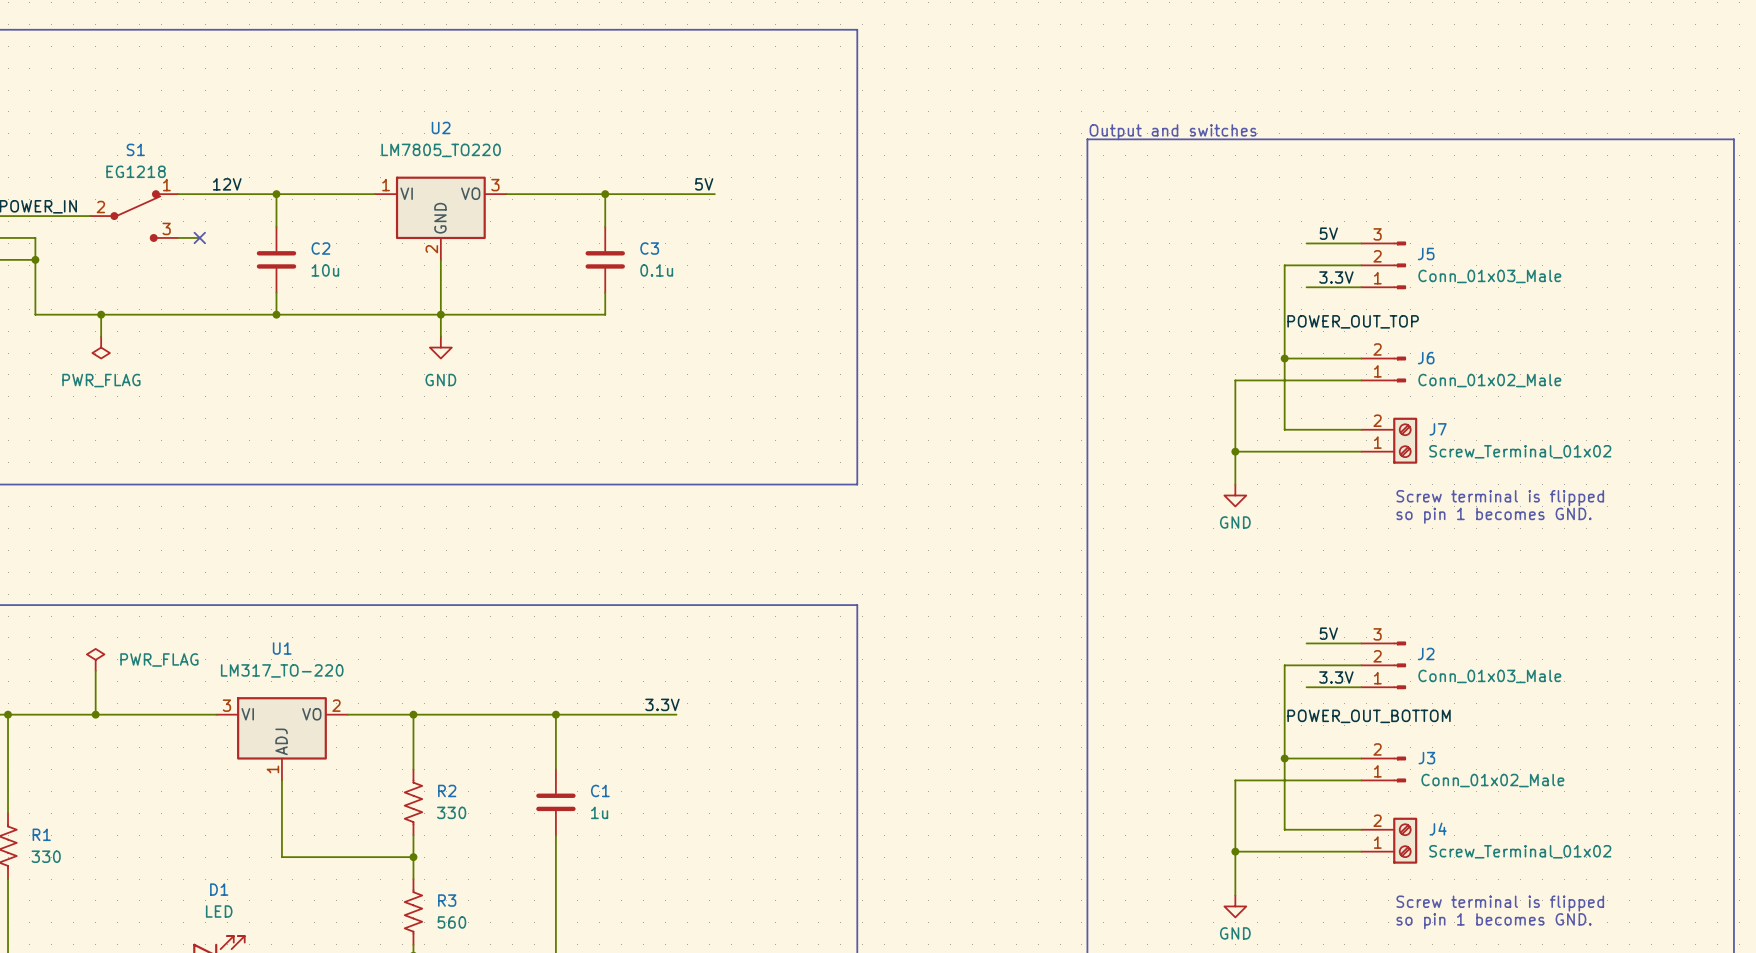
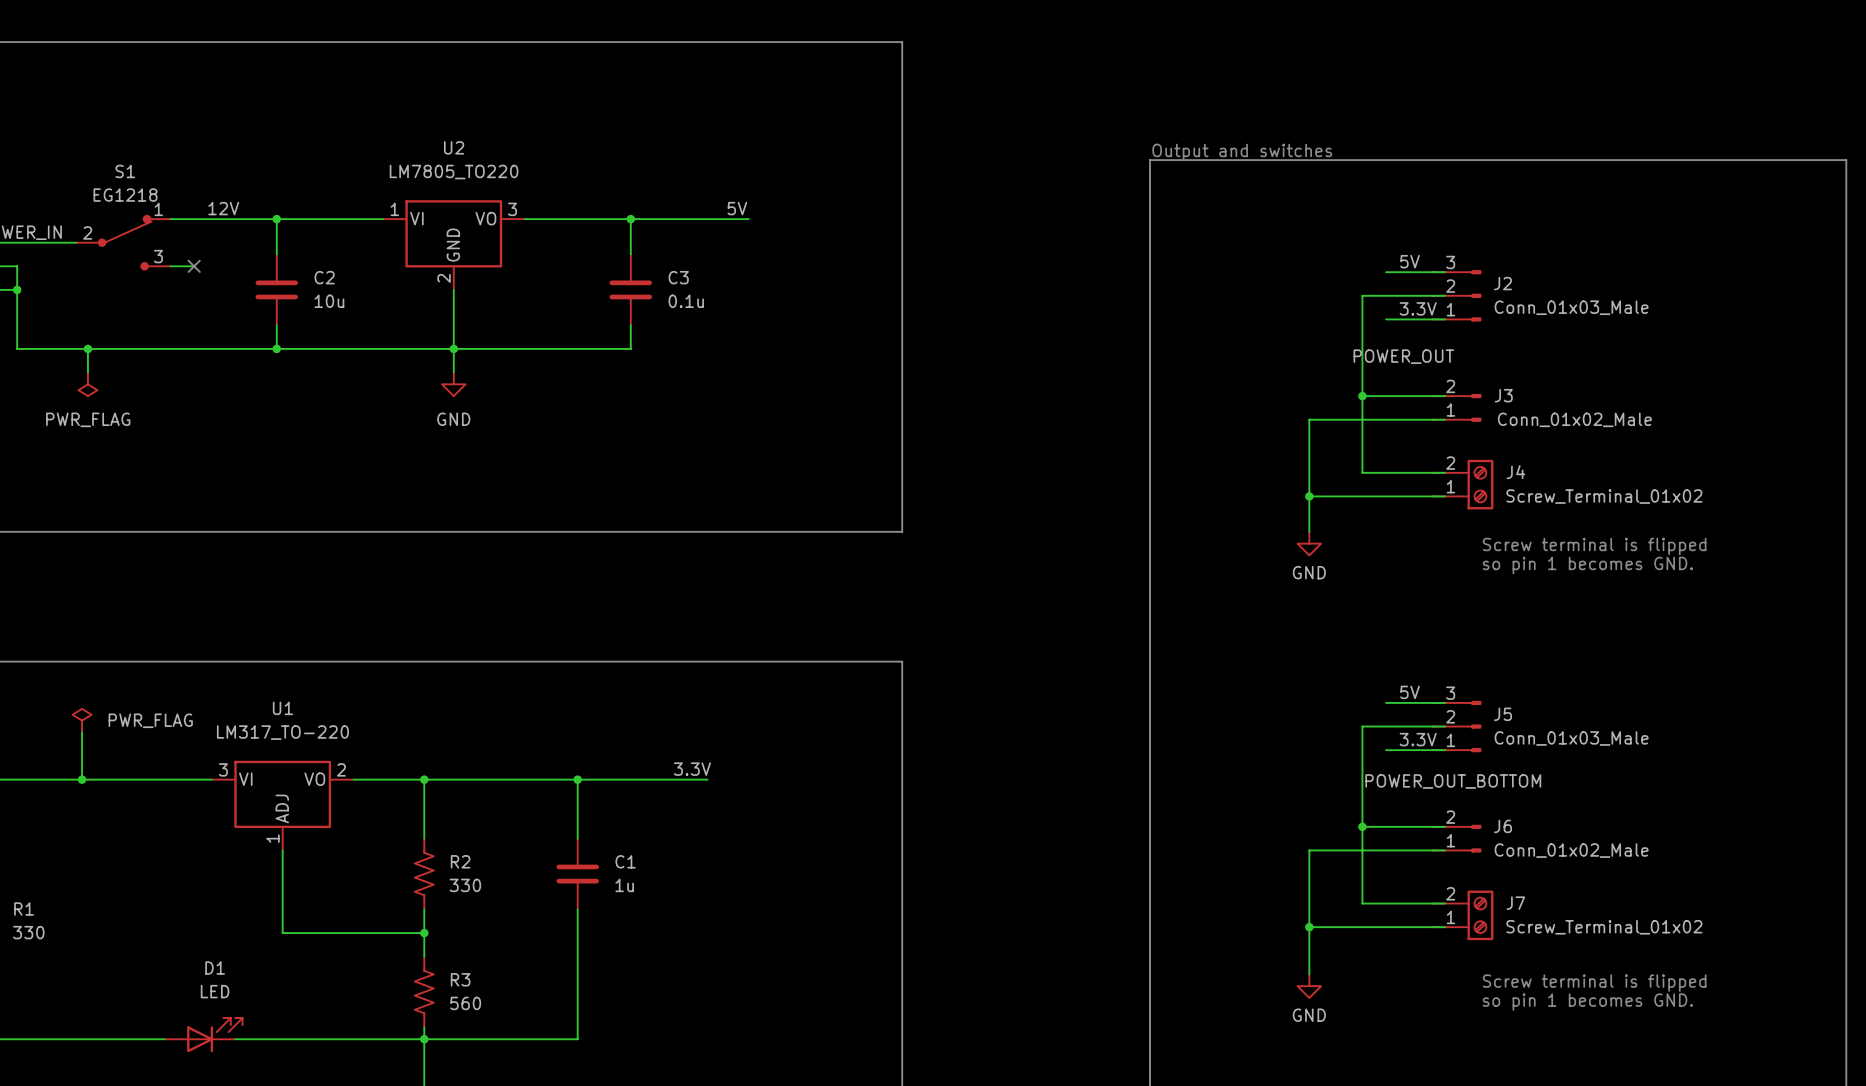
J5 position: (1383, 265) -> (1457, 726)
label: POWER_OUT_TOP (1353, 321) -> POWER_OUT (1403, 356)
J6 position: (1383, 369) -> (1457, 838)
J7 position: (1389, 440) -> (1463, 915)
J2 position: (1383, 665) -> (1457, 295)
J3 position: (1383, 769) -> (1457, 407)
J4 position: (1389, 840) -> (1463, 484)

